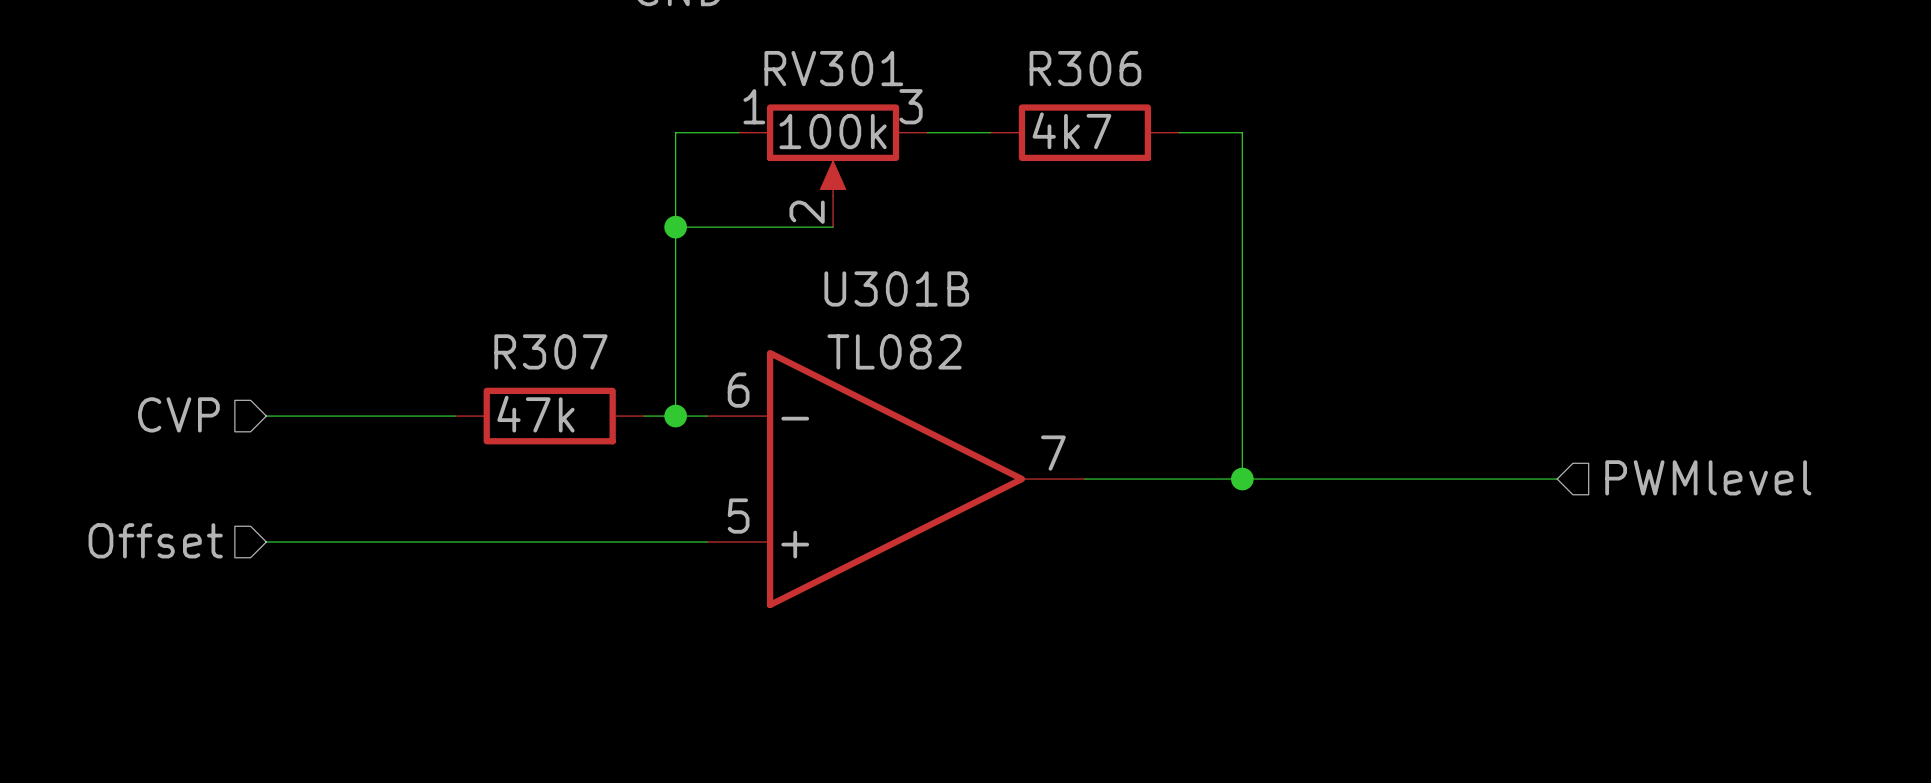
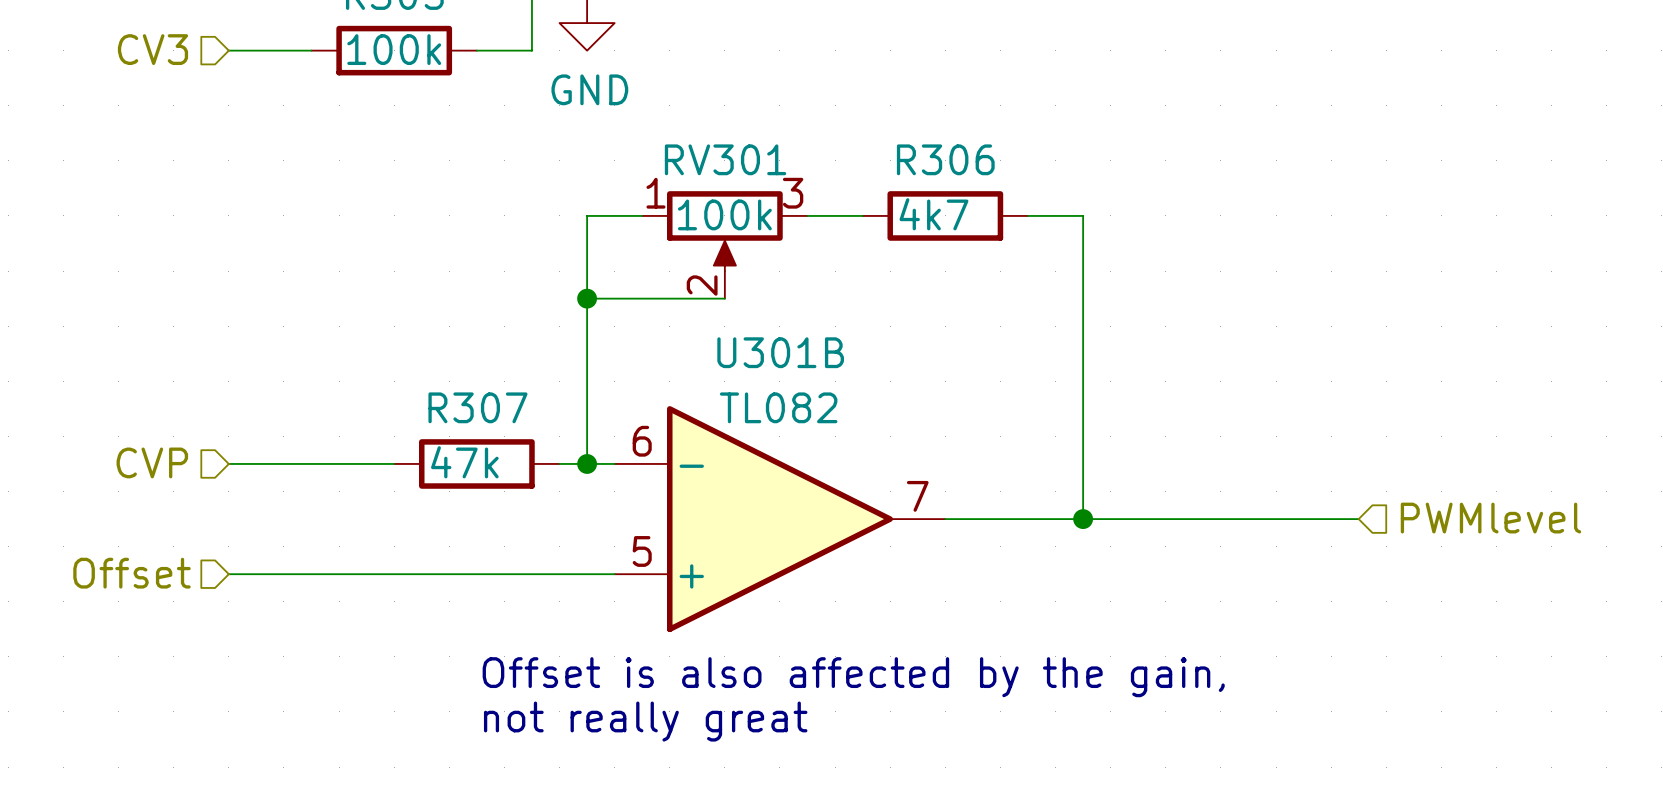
text: none -> Offset is also affected by the gain, (853, 677)
text: none -> not really great (645, 721)

